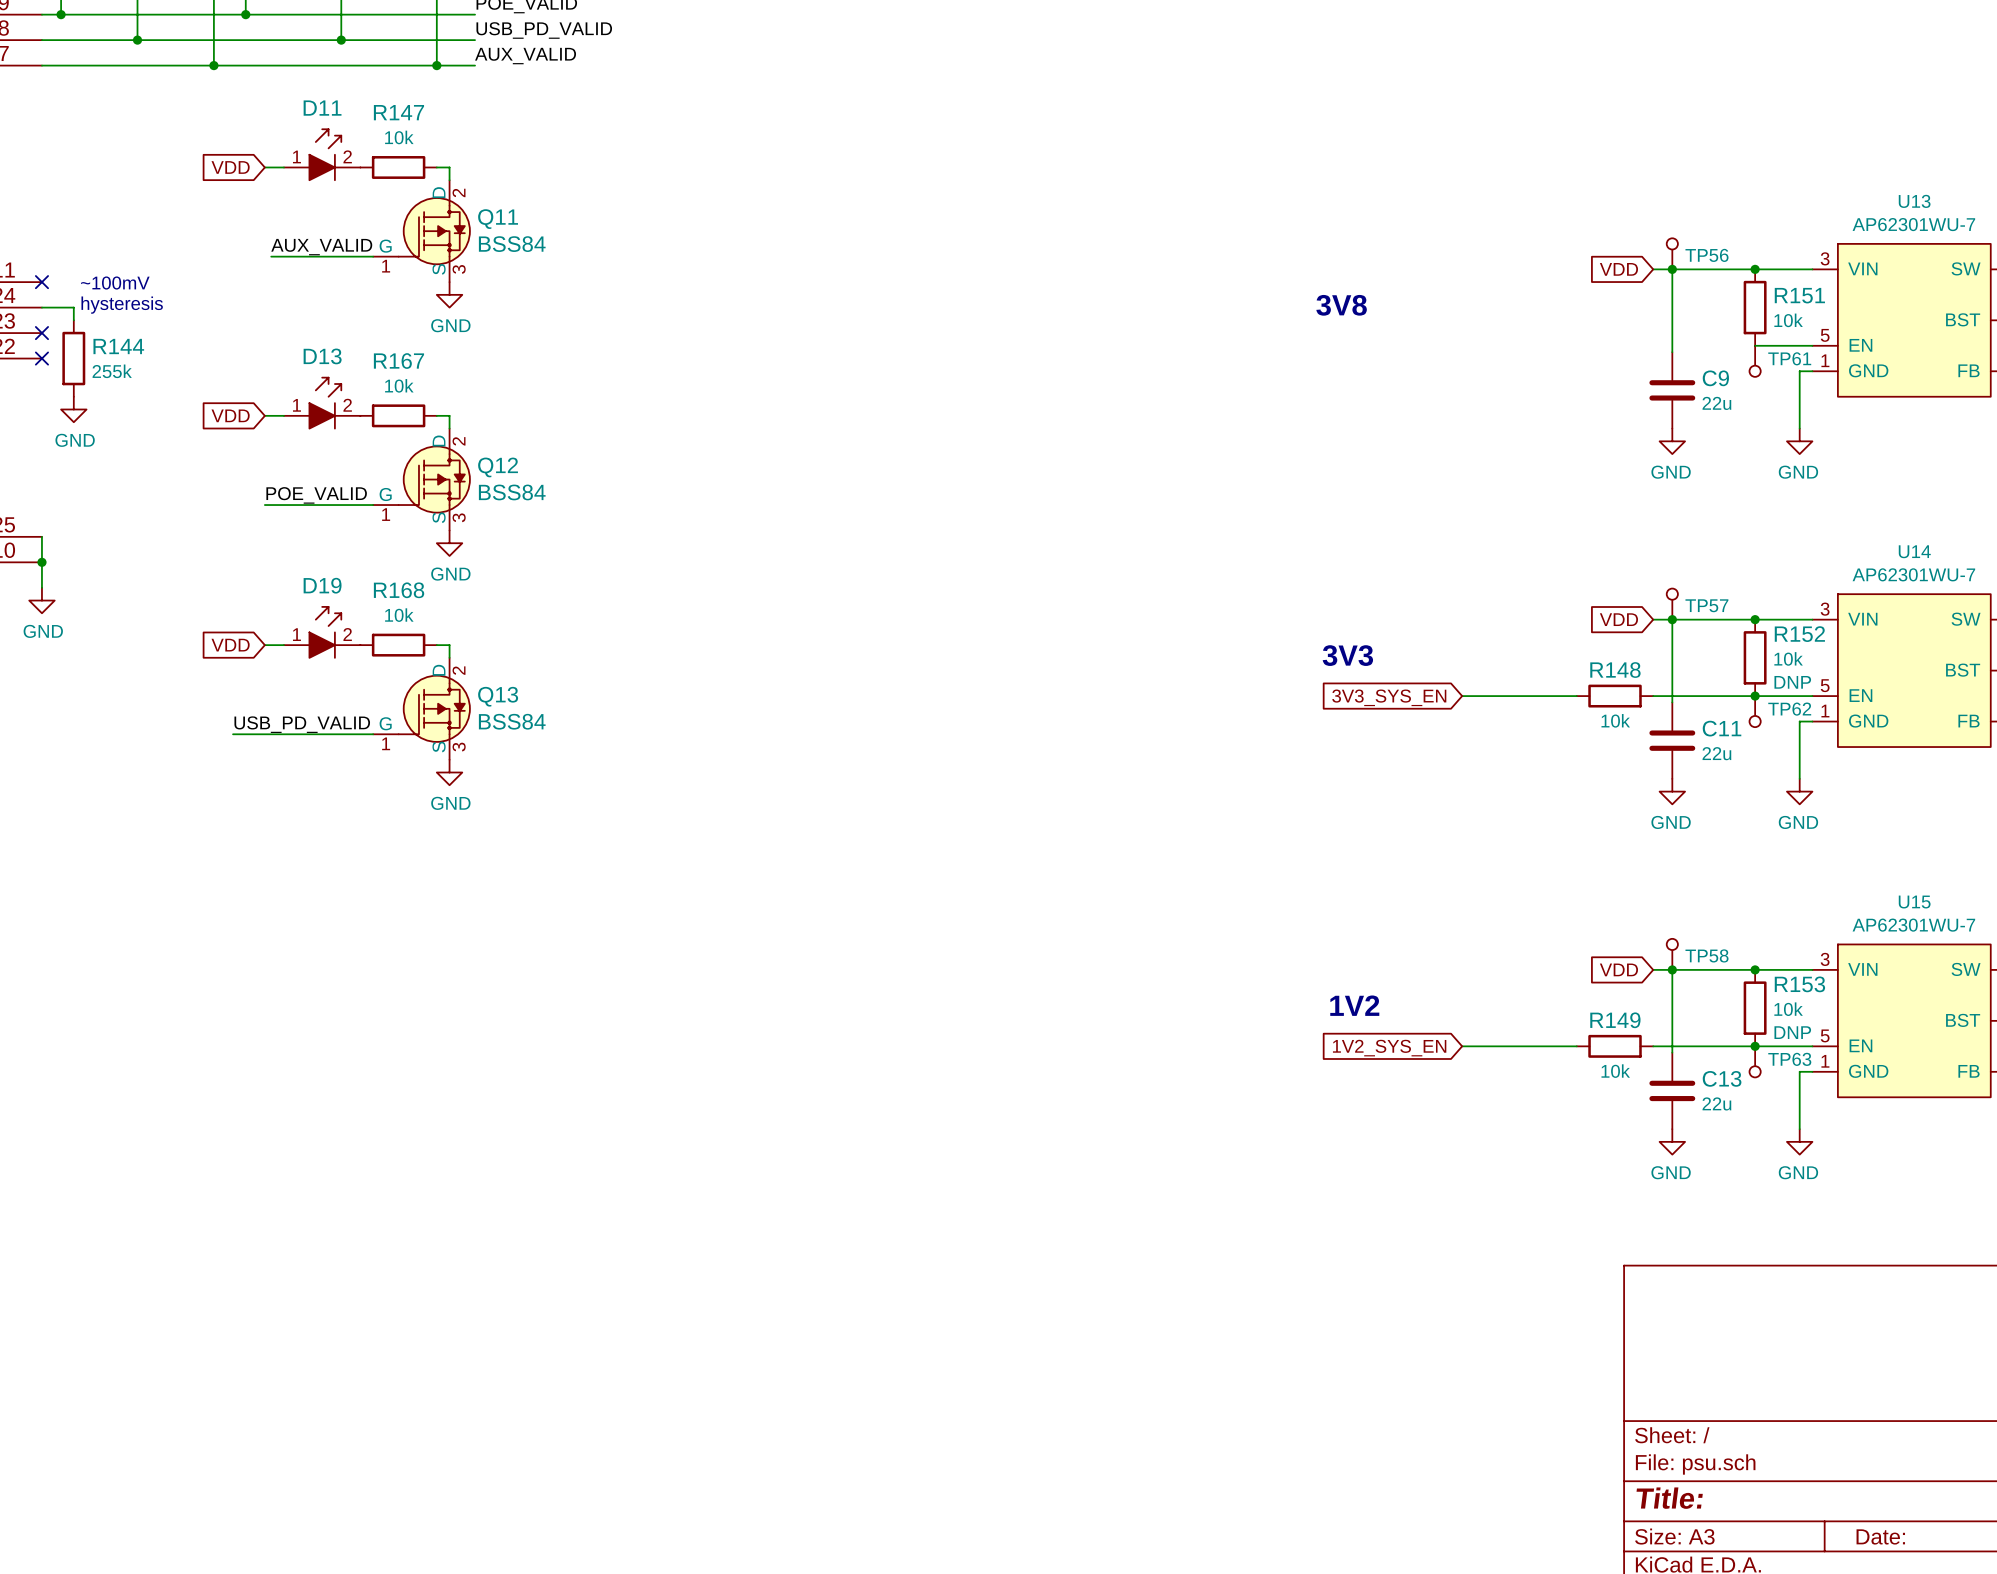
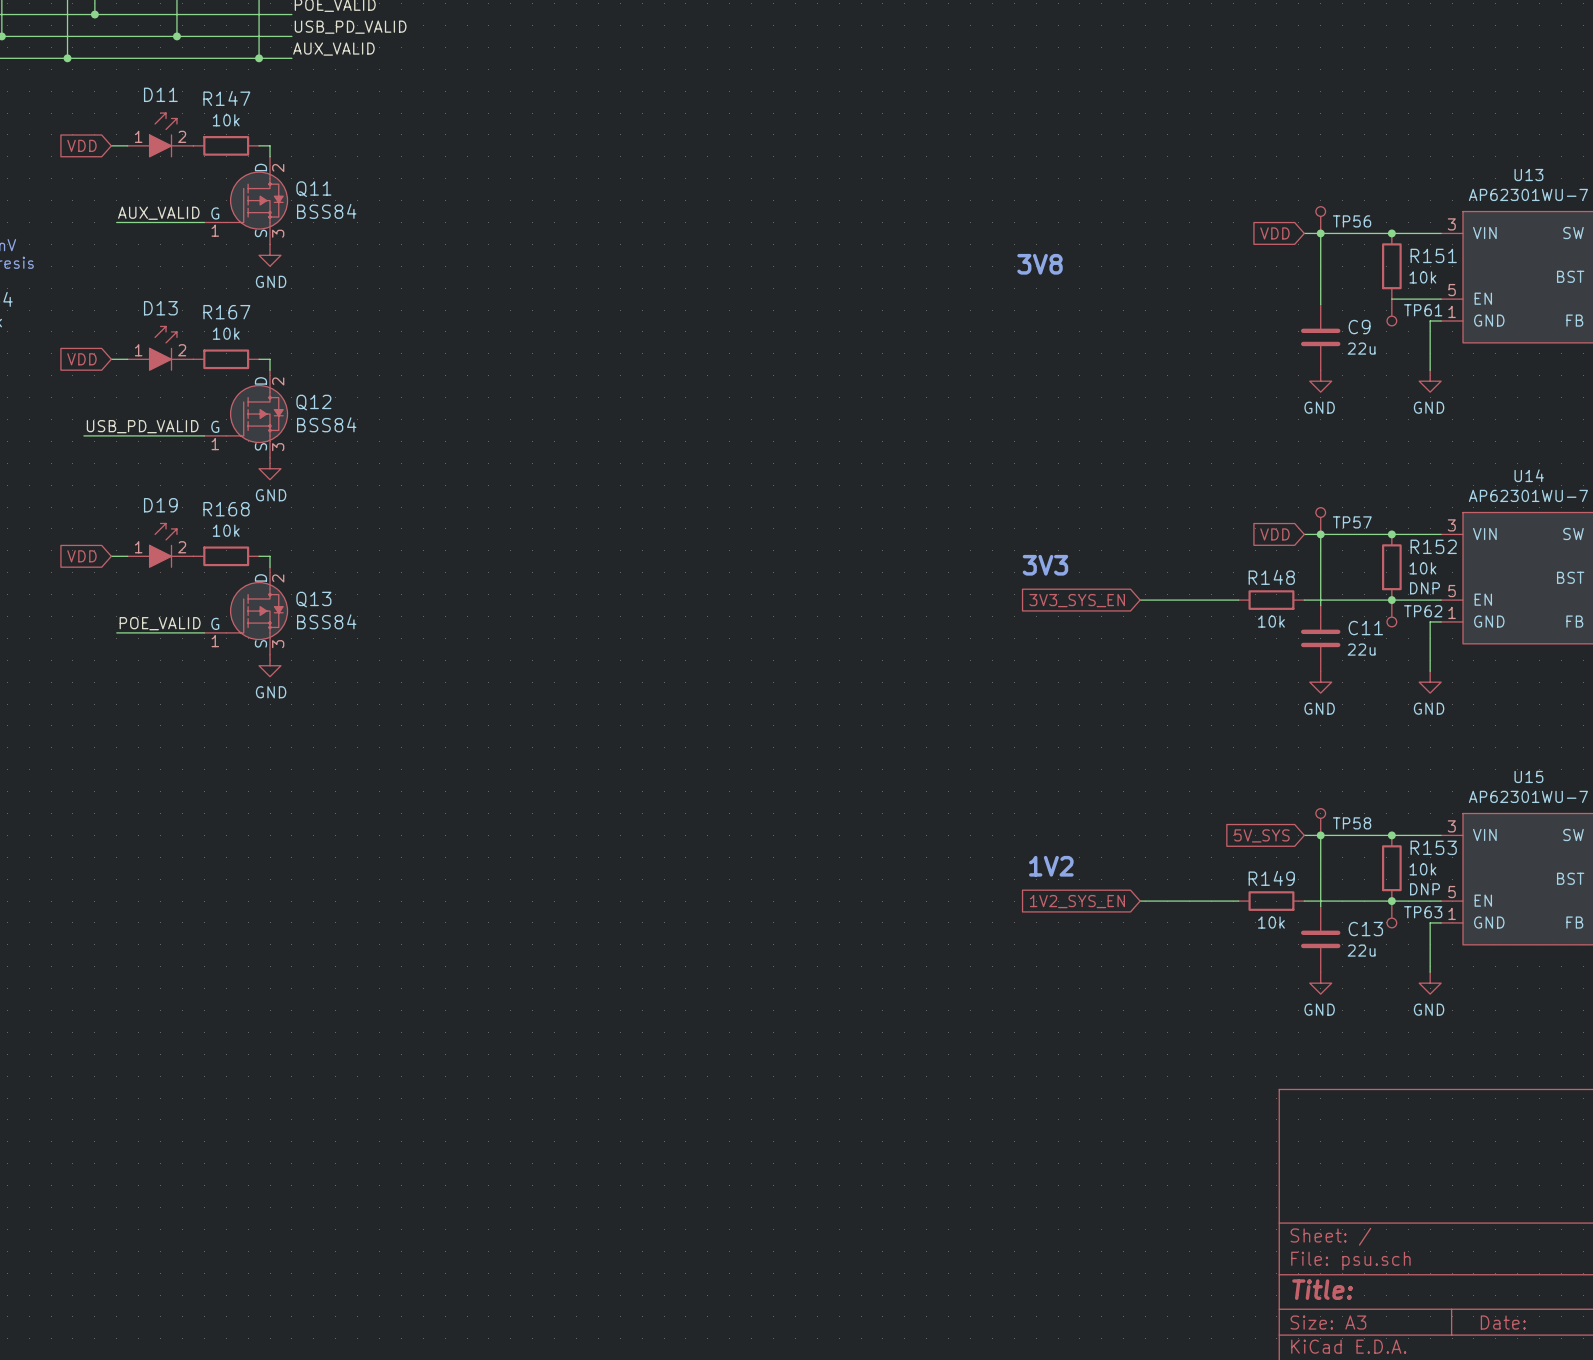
label position: POE_VALID (316, 495) -> POE_VALID (160, 623)
wire: none -> (83, 435) (111, 435)
label position: USB_PD_VALID (302, 724) -> USB_PD_VALID (142, 426)
wire: (233, 734) (271, 734) -> none
global label: VDD (1618, 969) -> 5V_SYS (1261, 835)

